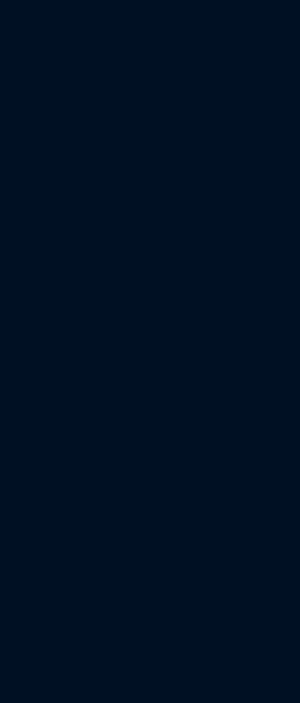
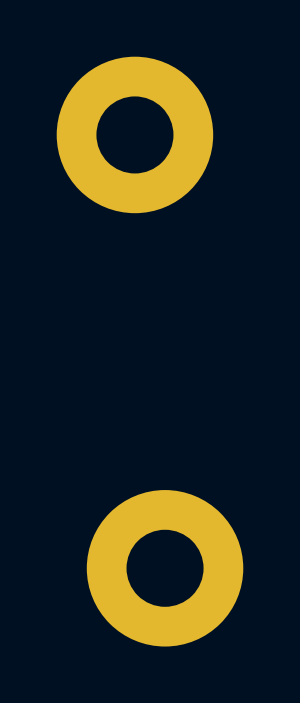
part: none -> (134, 134)
part: none -> (165, 568)

